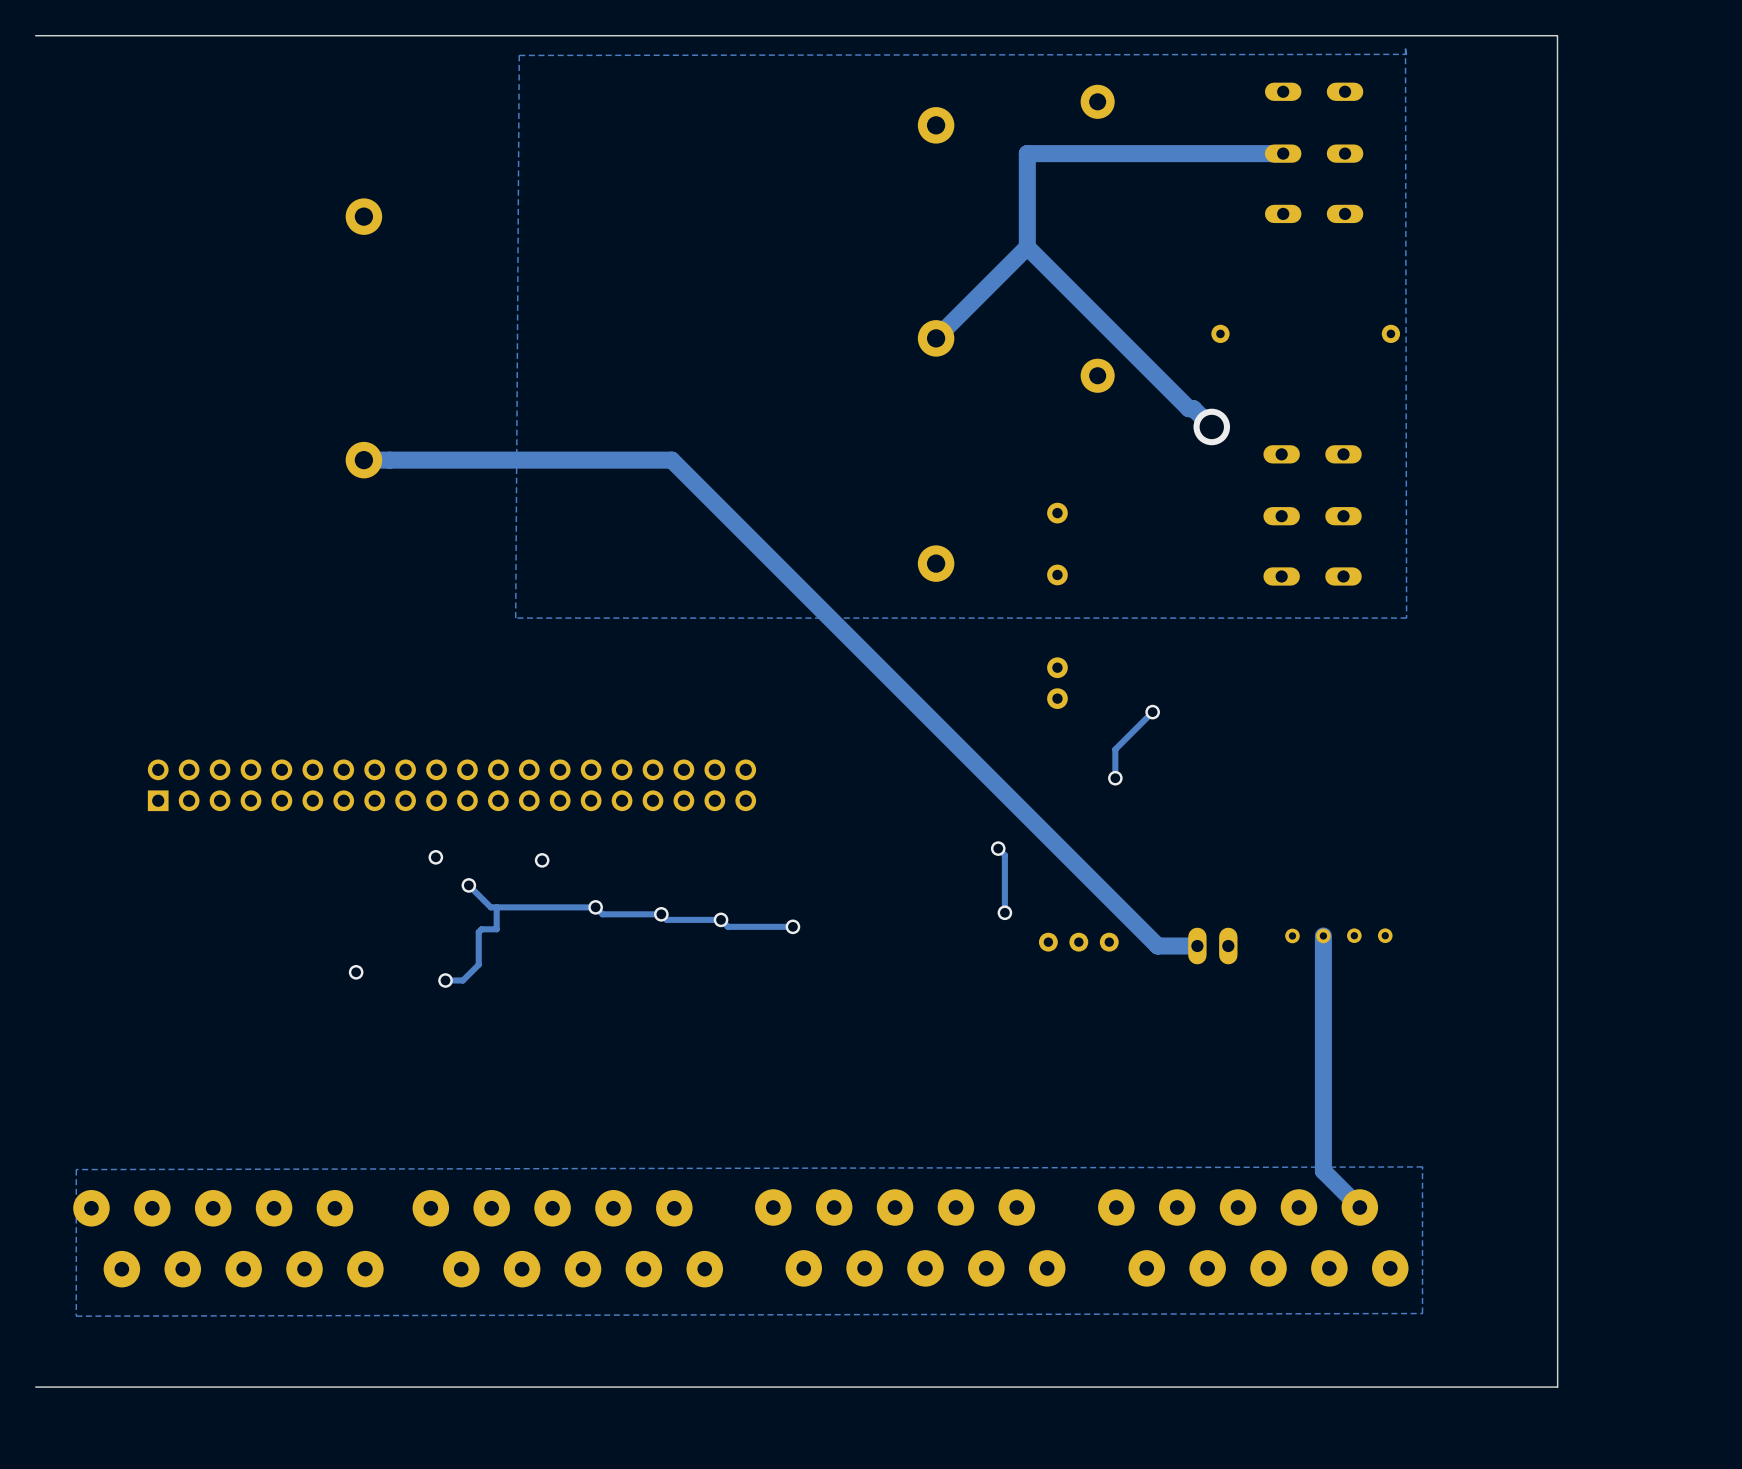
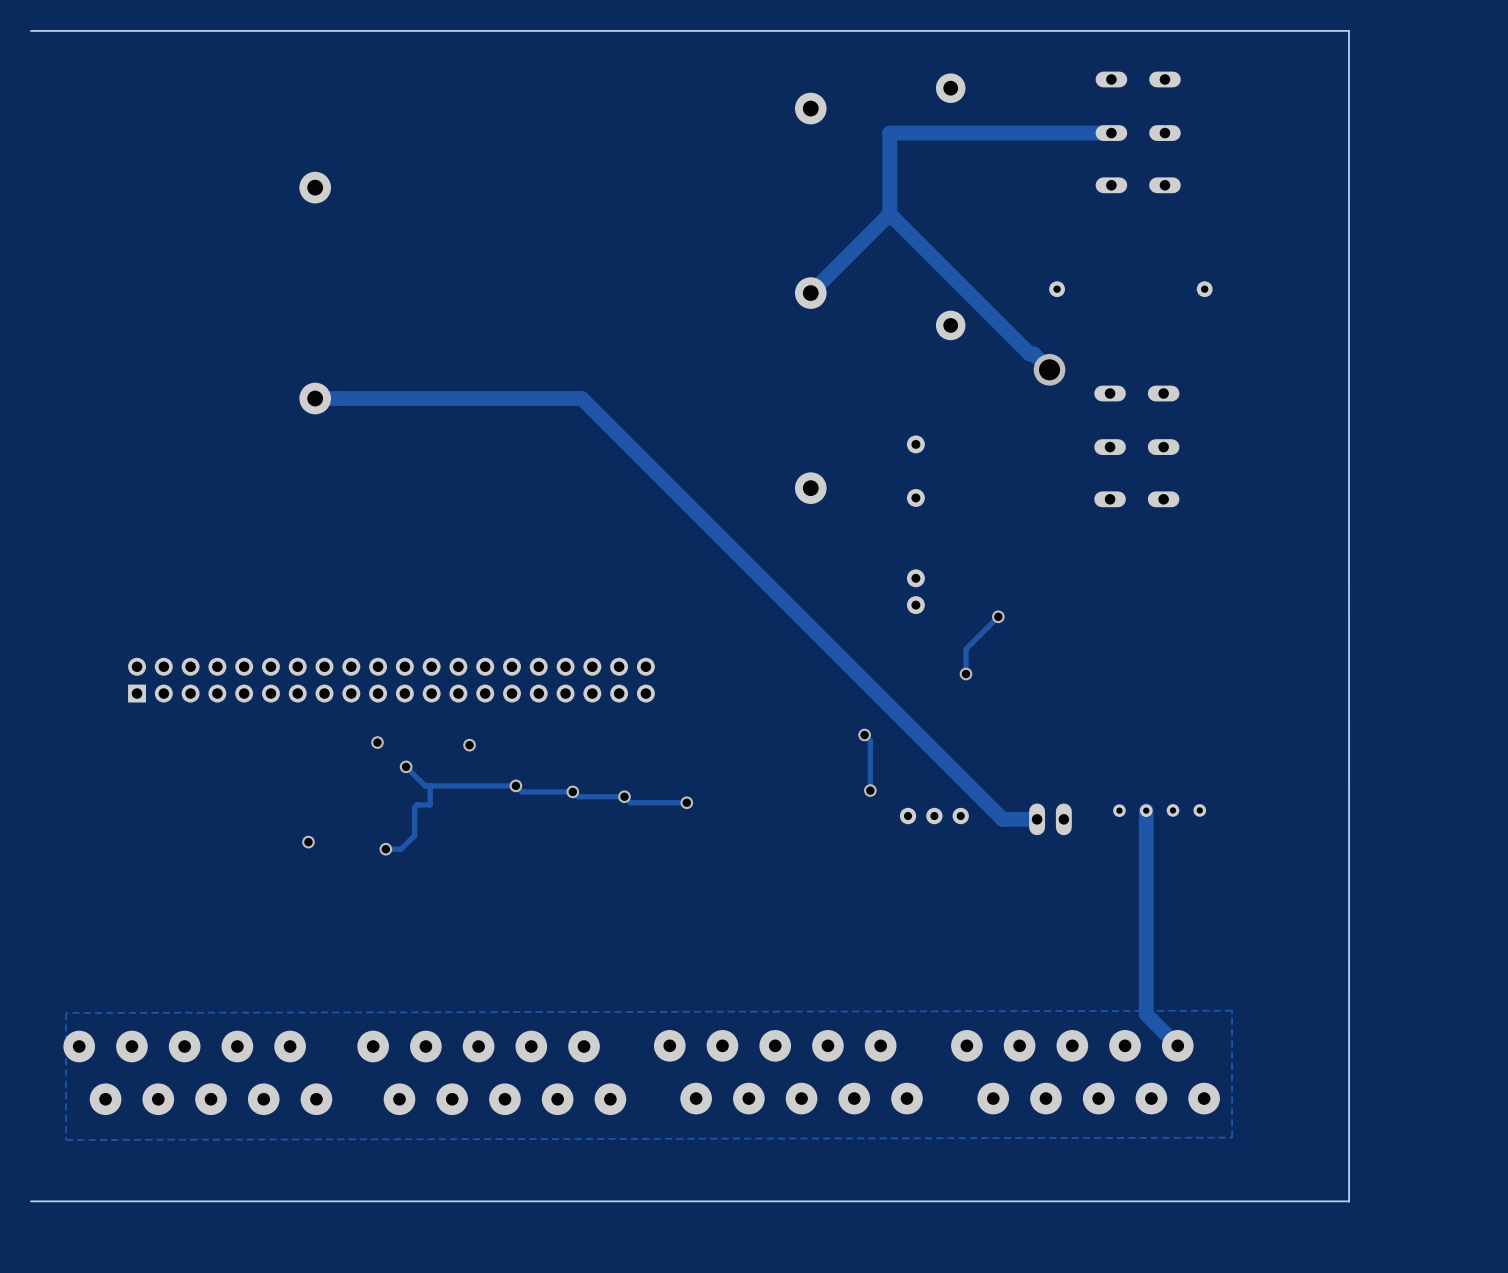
zone outline: (1405, 48) (1406, 618) (515, 618) (519, 55) (1406, 54) (1405, 48) -> none

